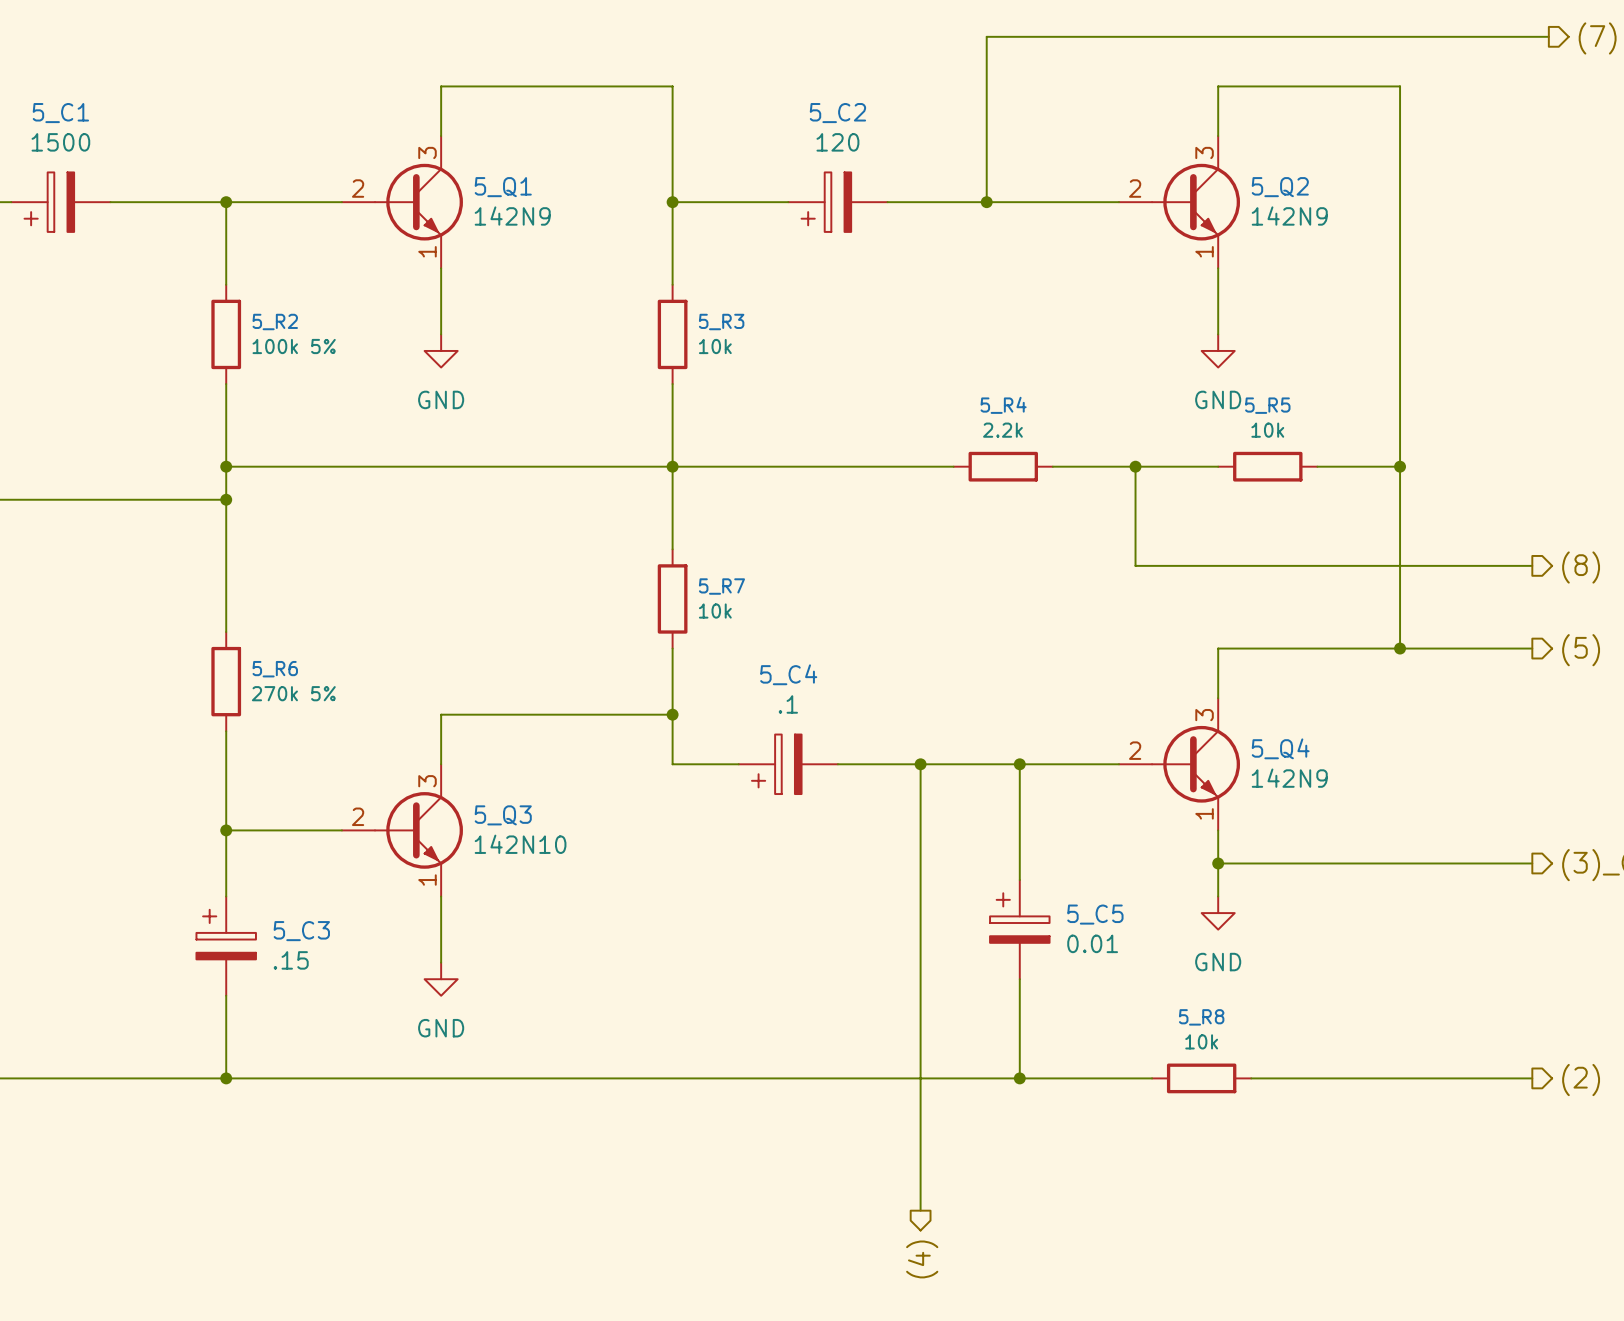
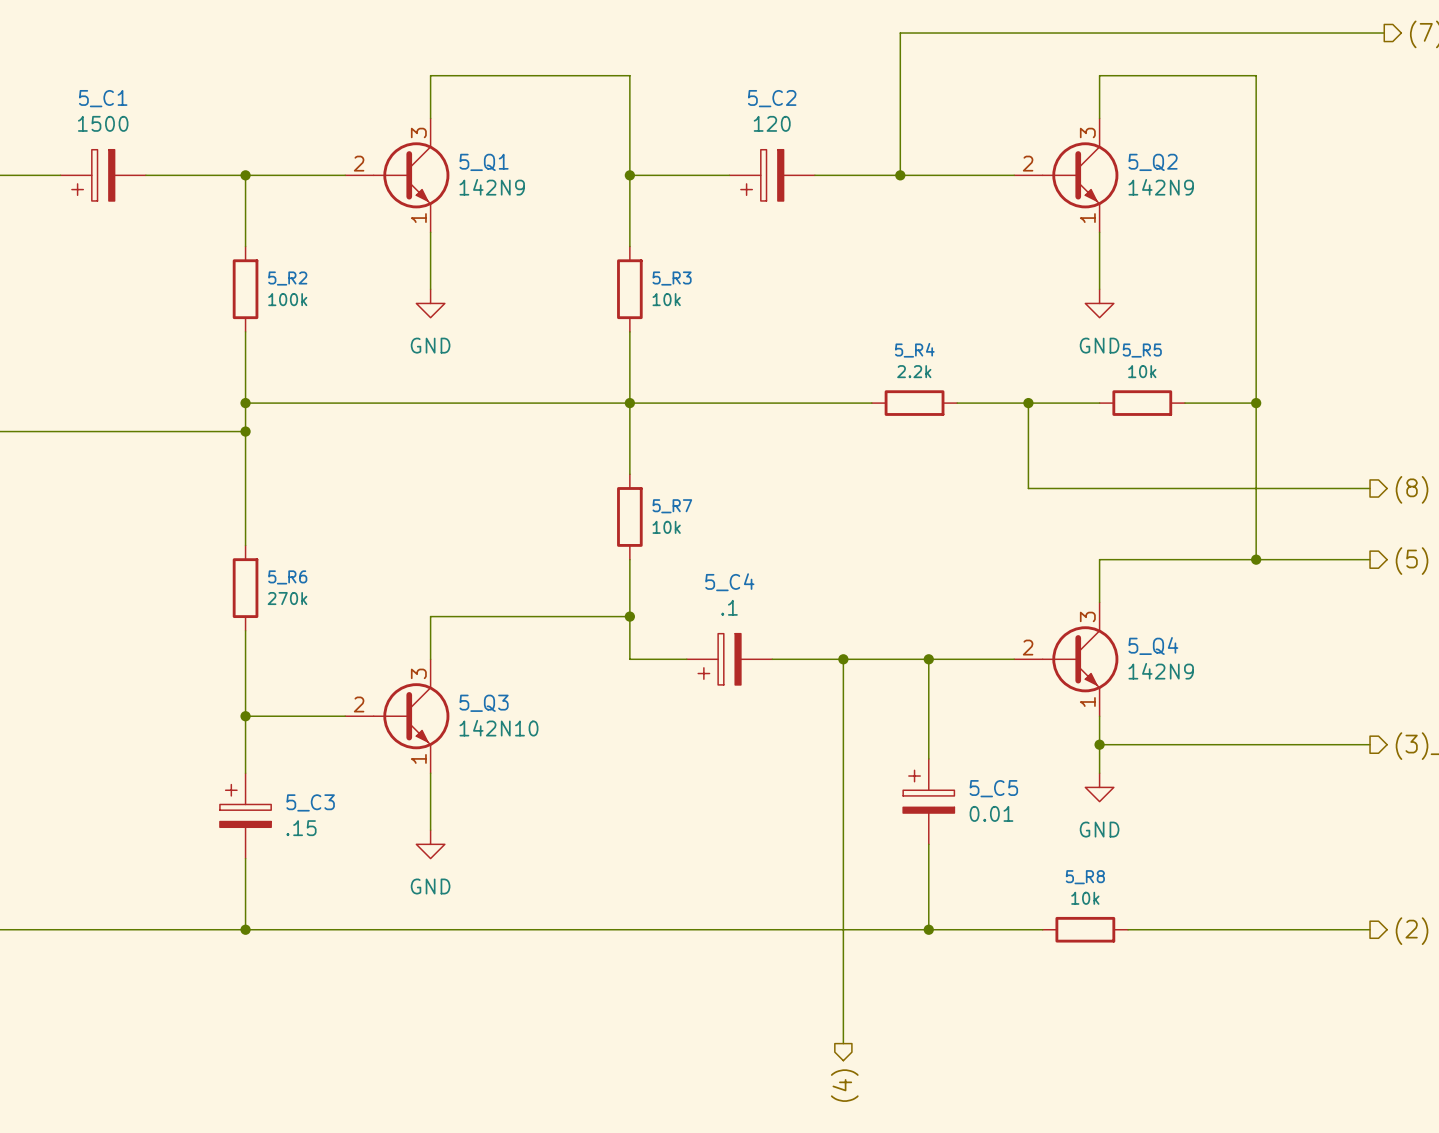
5_R2 value: 100k 5% (294, 346) -> 100k (287, 299)
5_R6 value: 270k 5% (293, 693) -> 270k (287, 598)

